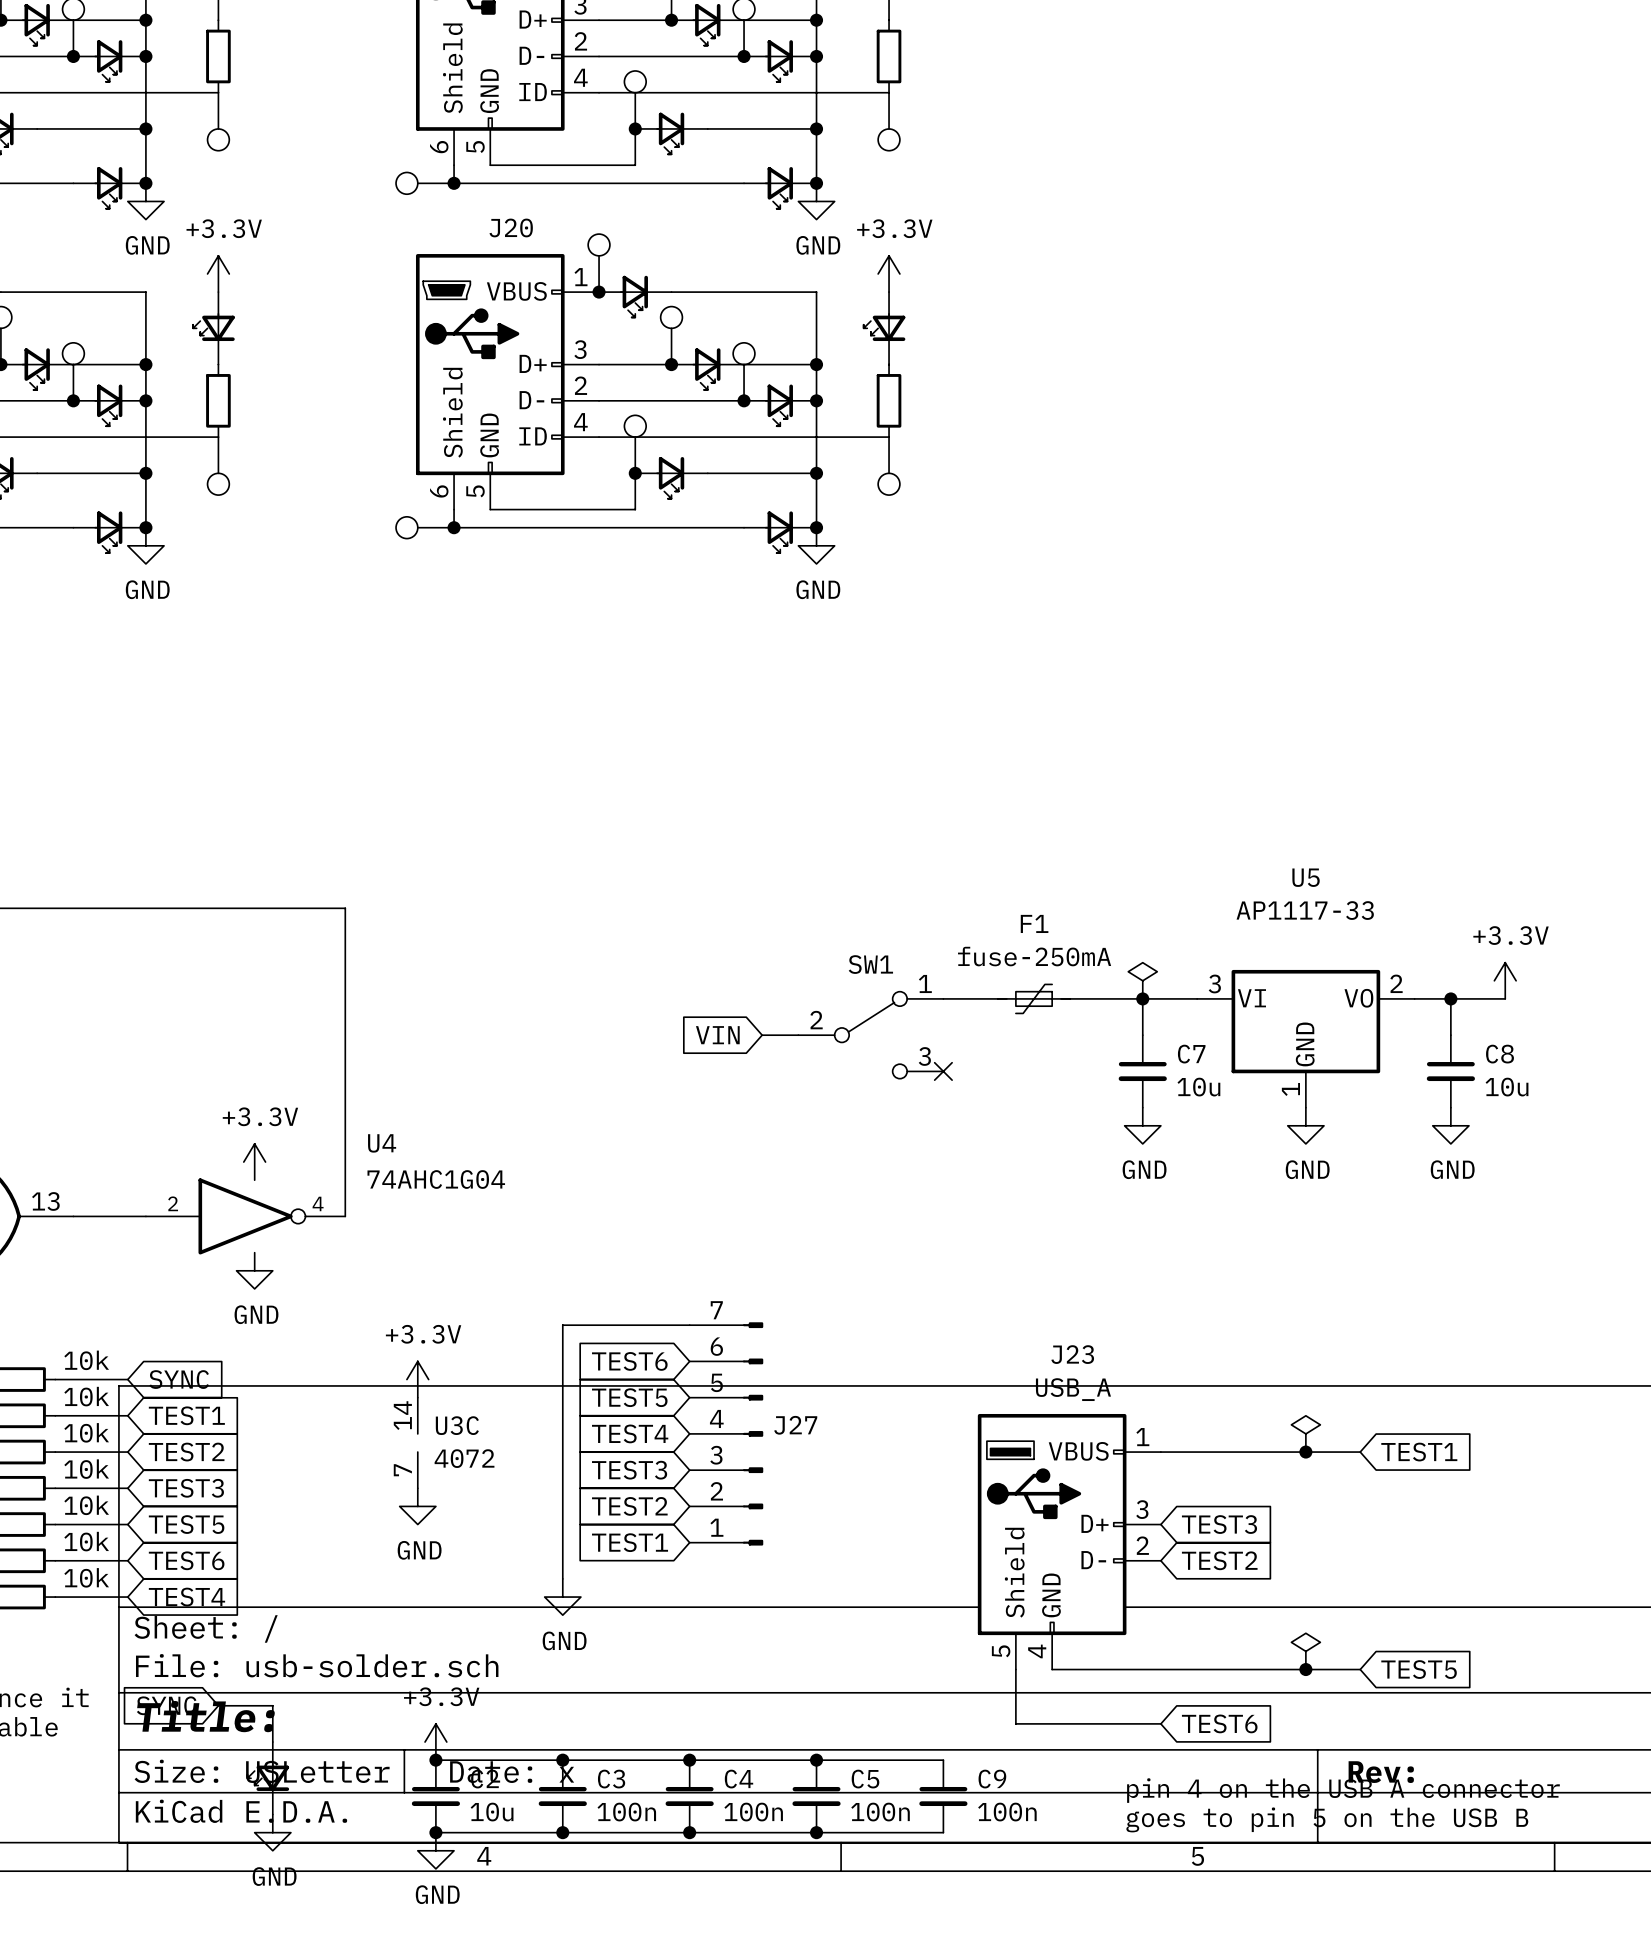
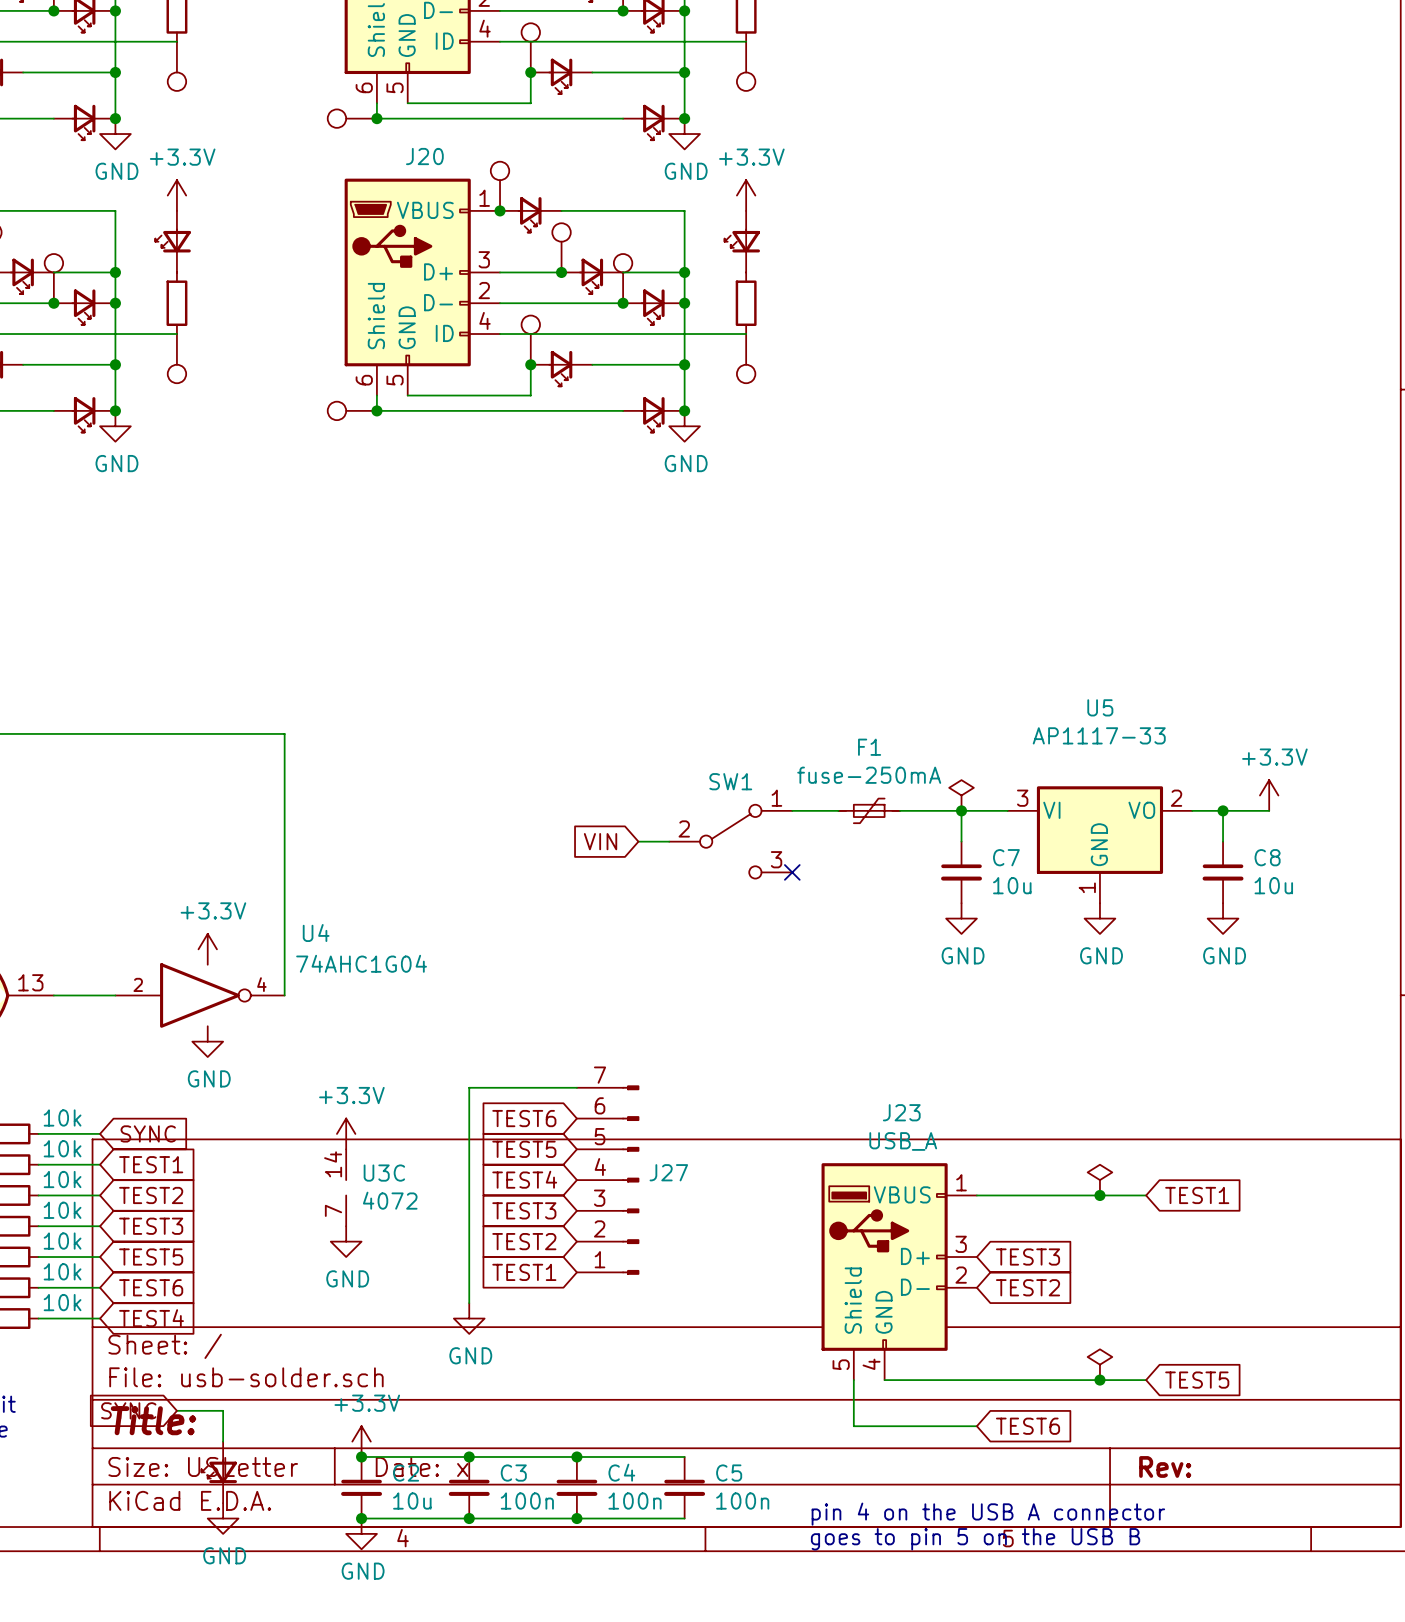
wire: (816, 1760) (943, 1760) -> none
junction: (816, 1760) -> none
text position: pin 4 on the USB A connector (1343, 1790) -> pin 4 on the USB A connector (988, 1514)
C9: 100n (943, 1796) -> none
text position: goes to pin 5 on the USB B (1327, 1819) -> goes to pin 5 on the USB B (975, 1539)
wire: (816, 1832) (943, 1832) -> none
junction: (816, 1832) -> none

